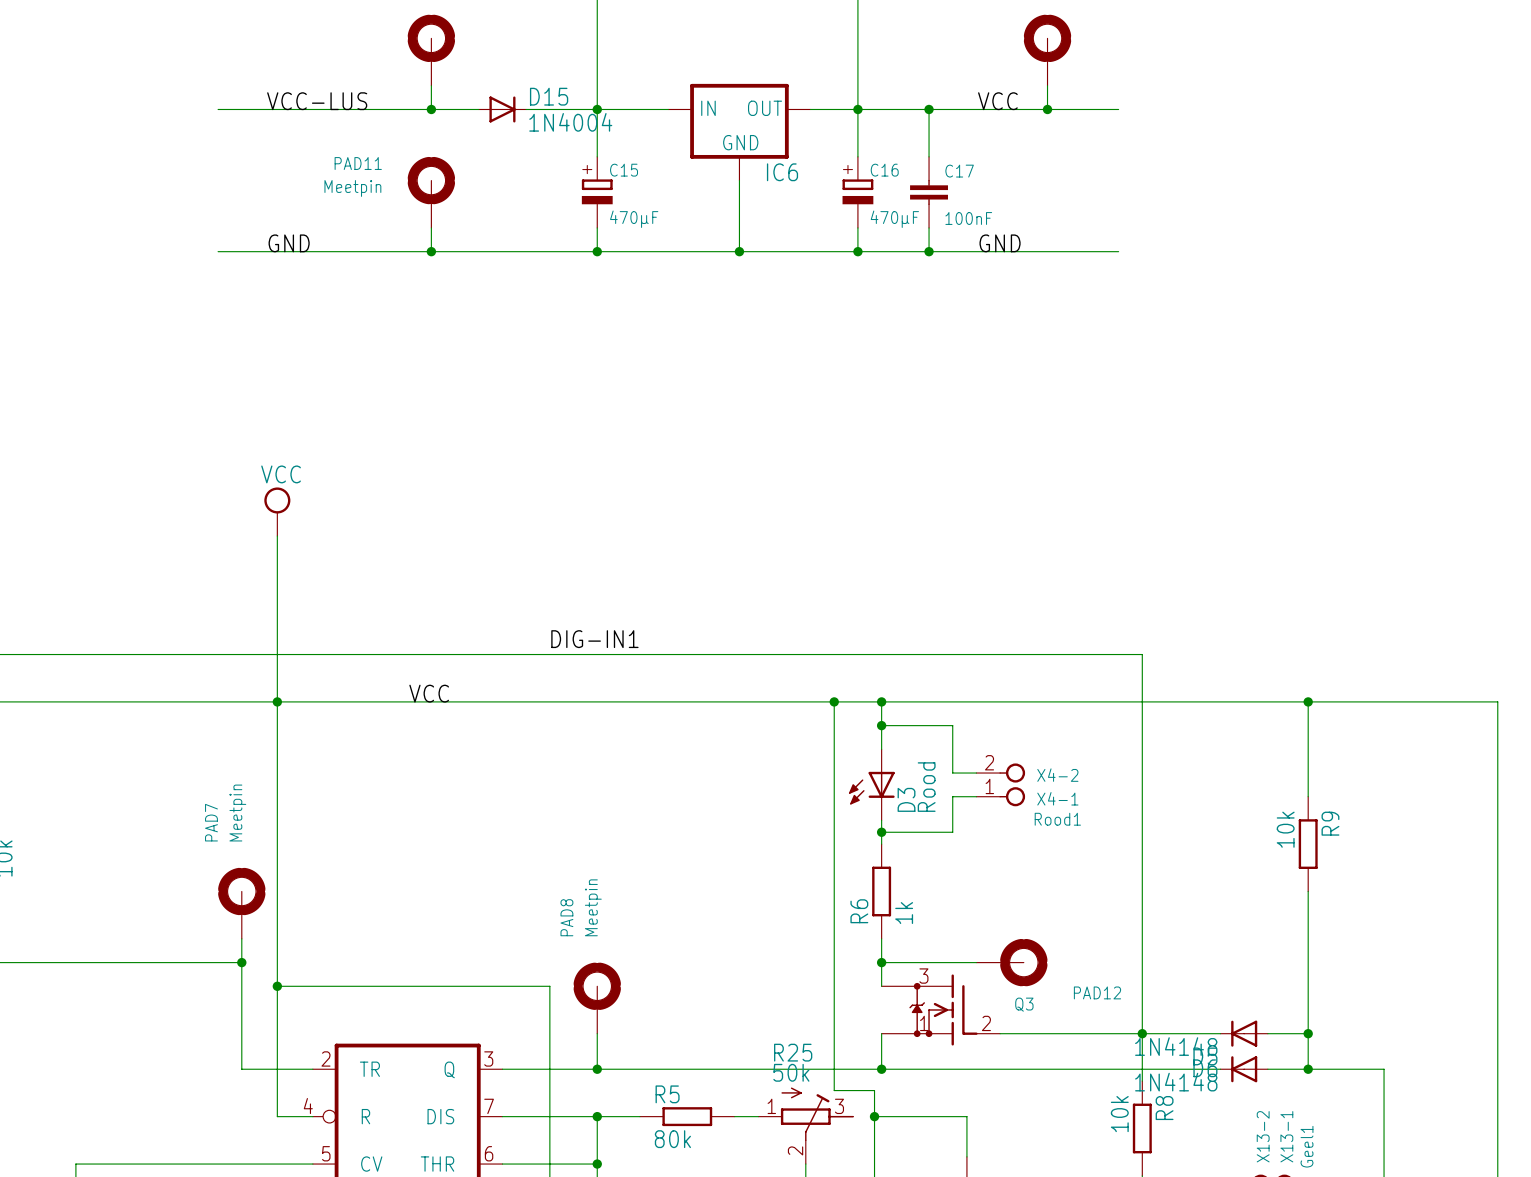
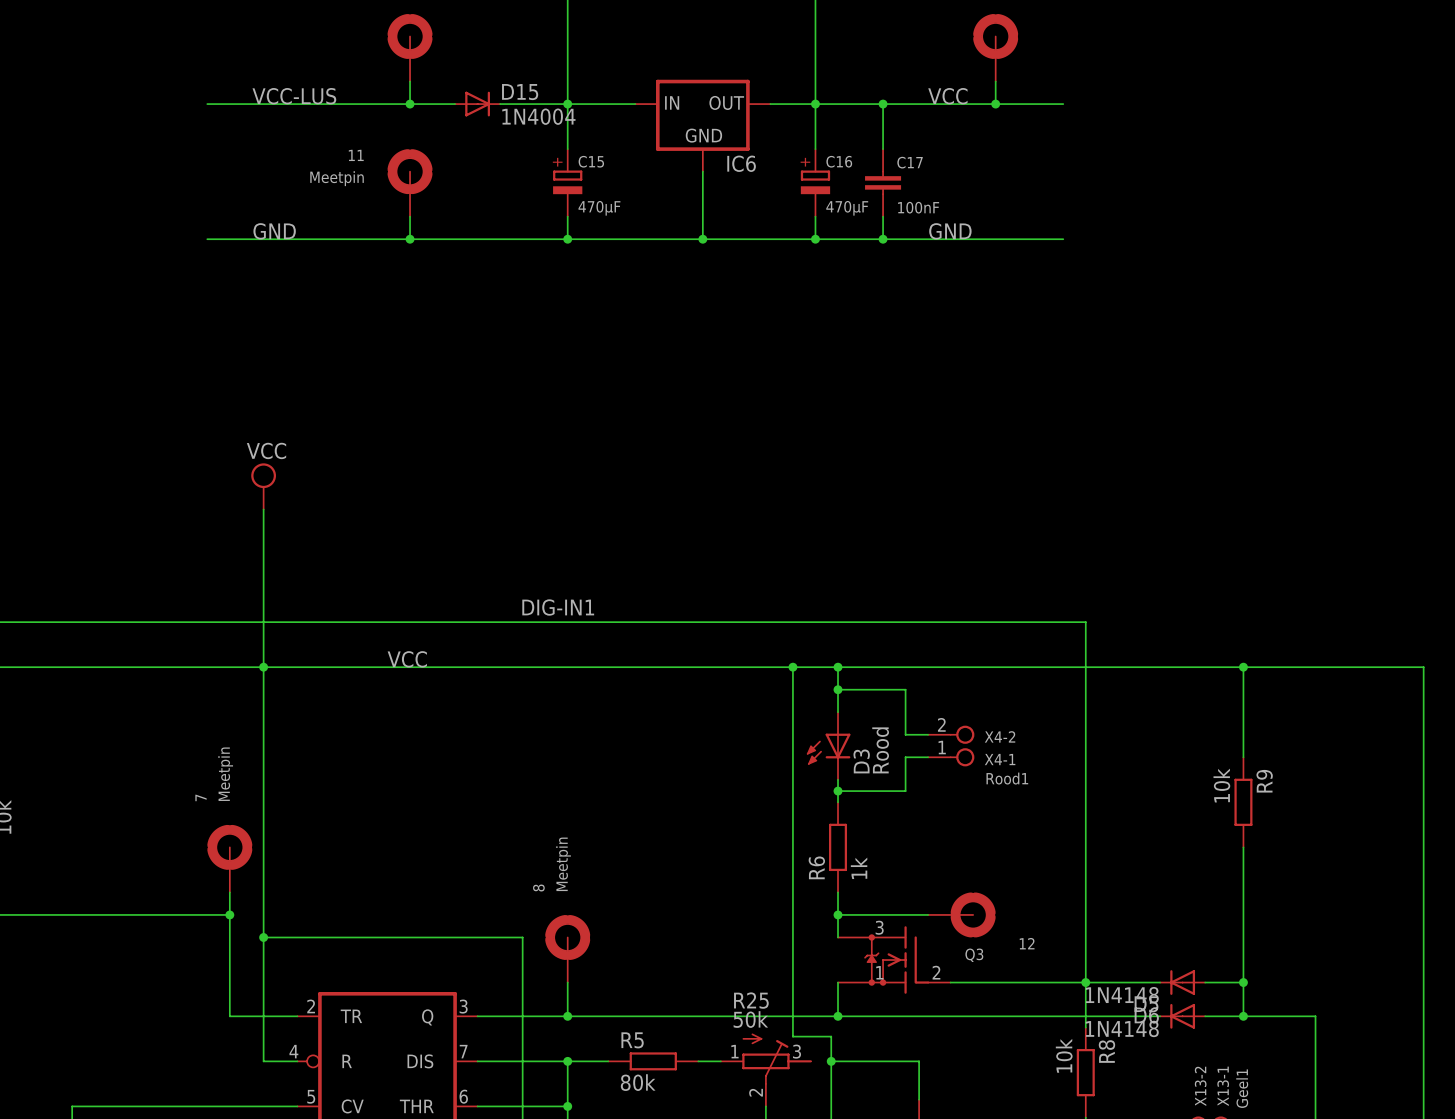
PAD11 name: PAD11 (358, 163) -> 11 (356, 155)
PAD7 name: PAD7 (211, 822) -> 7 (201, 797)
PAD8 name: PAD8 (566, 917) -> 8 (538, 888)
PAD12 name: PAD12 (1097, 992) -> 12 (1027, 943)

